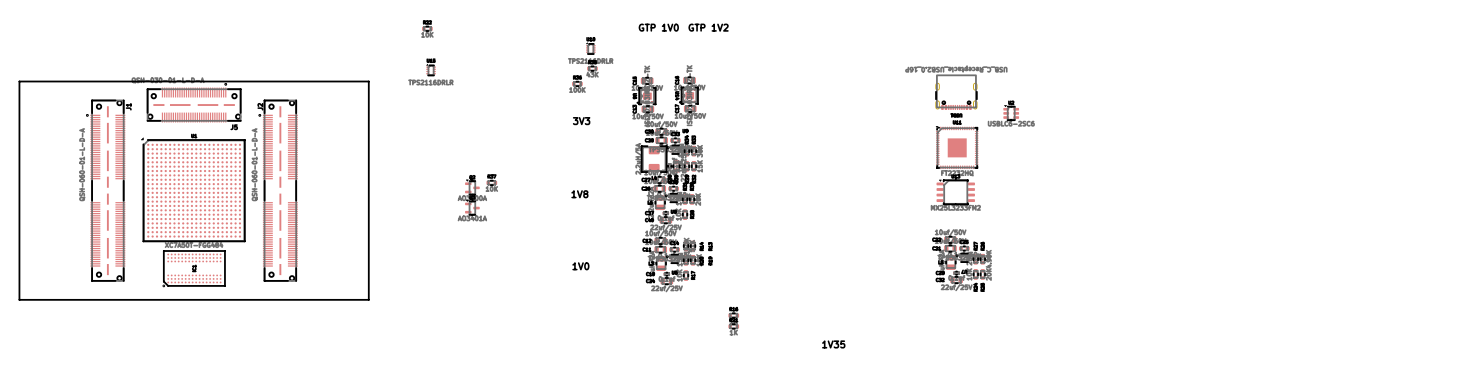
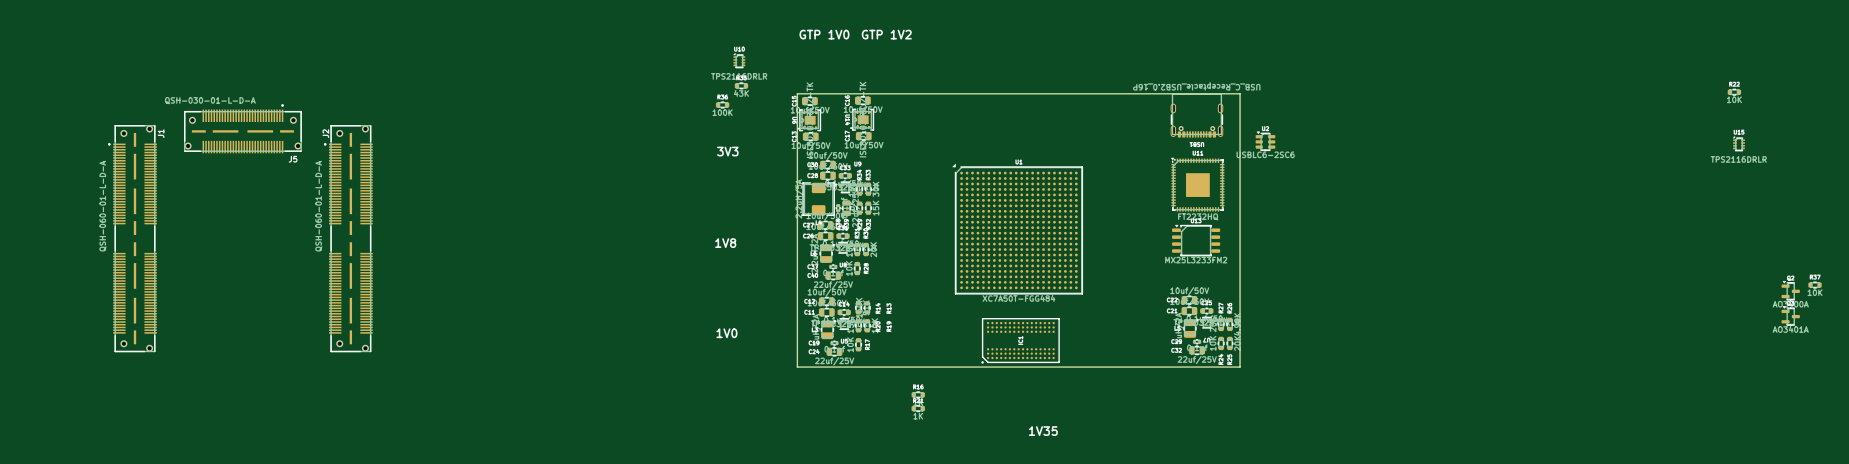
part position: (427, 28) -> (1734, 92)
part position: (431, 69) -> (1738, 143)
board edge: none -> (797, 93) (1240, 93) (1240, 367) (797, 367) (797, 93)
board edge: (19, 81) (368, 81) (368, 299) (19, 299) (19, 81) -> none
part position: (491, 182) -> (1815, 285)
part position: (472, 187) -> (1790, 290)
part position: (193, 189) -> (1017, 229)
part position: (472, 207) -> (1790, 315)
part position: (194, 268) -> (1020, 340)

